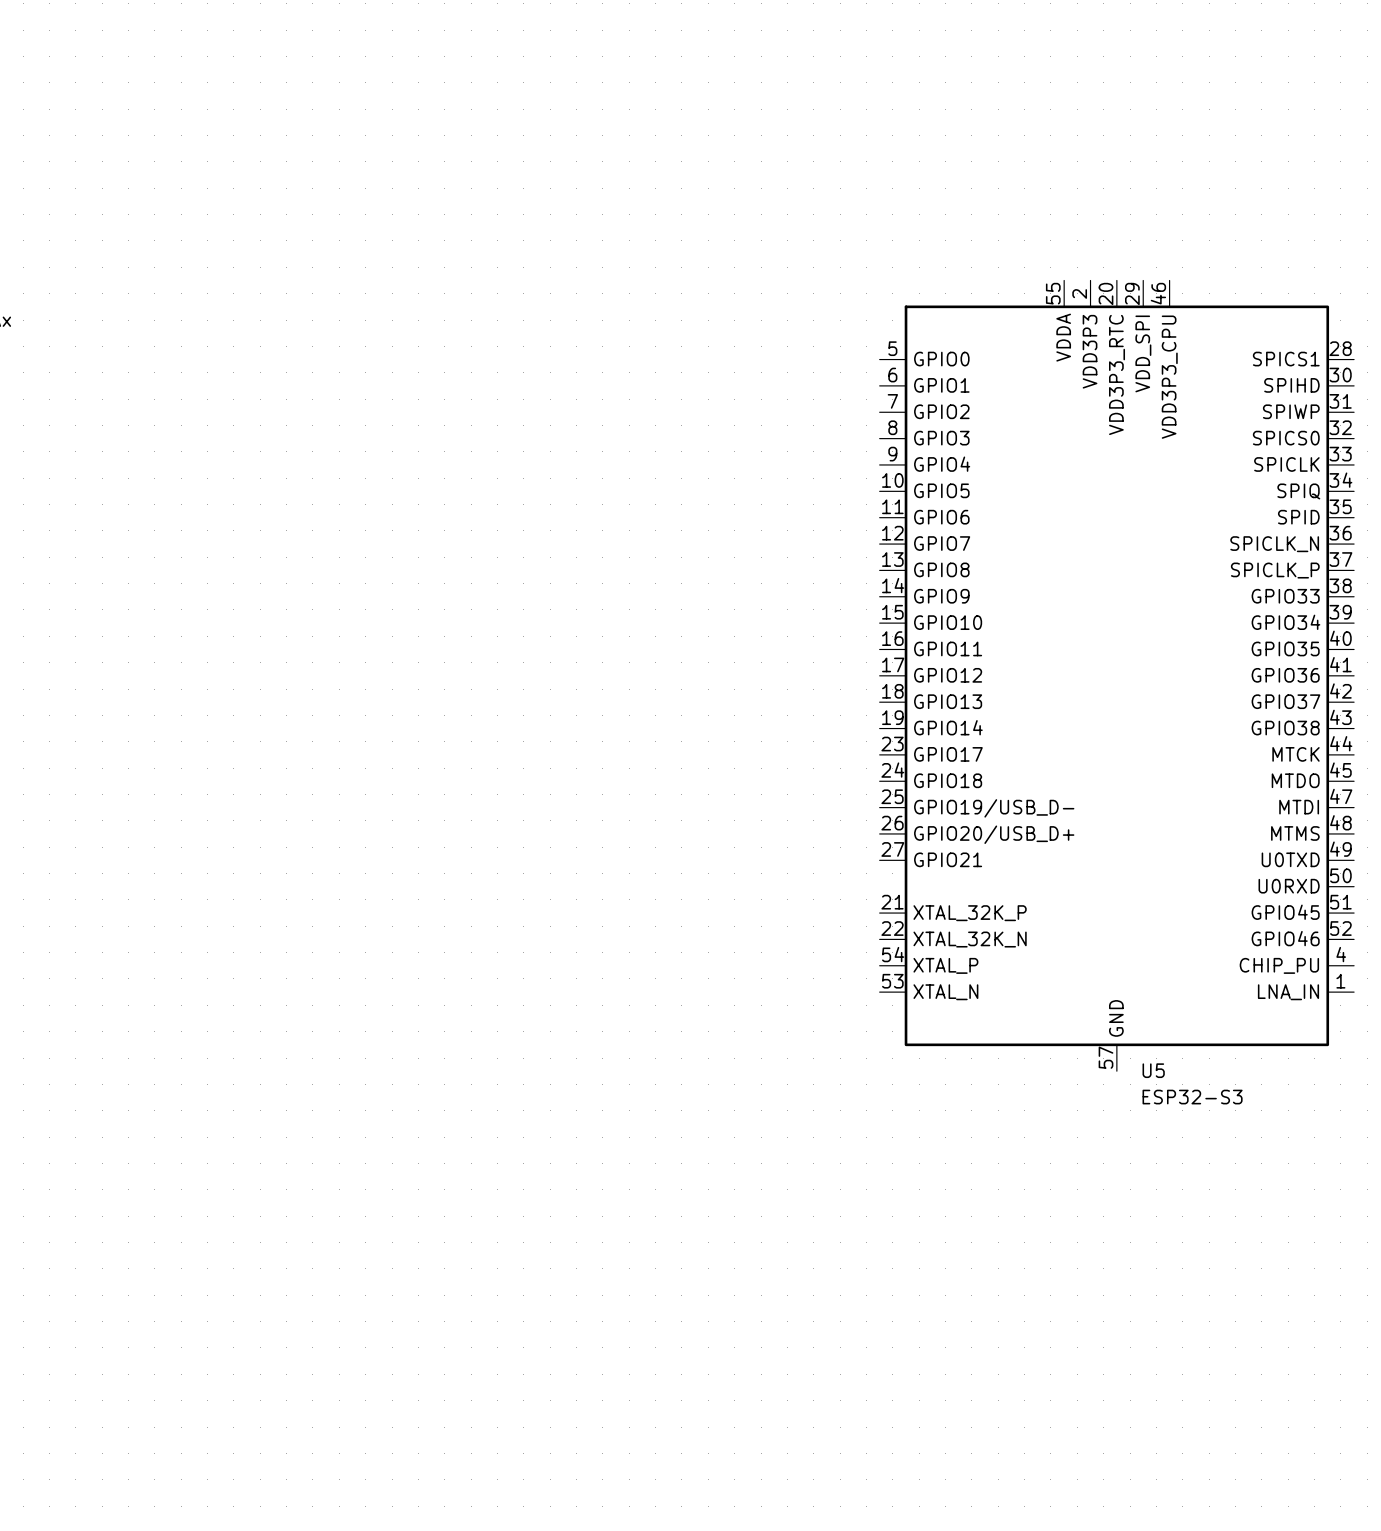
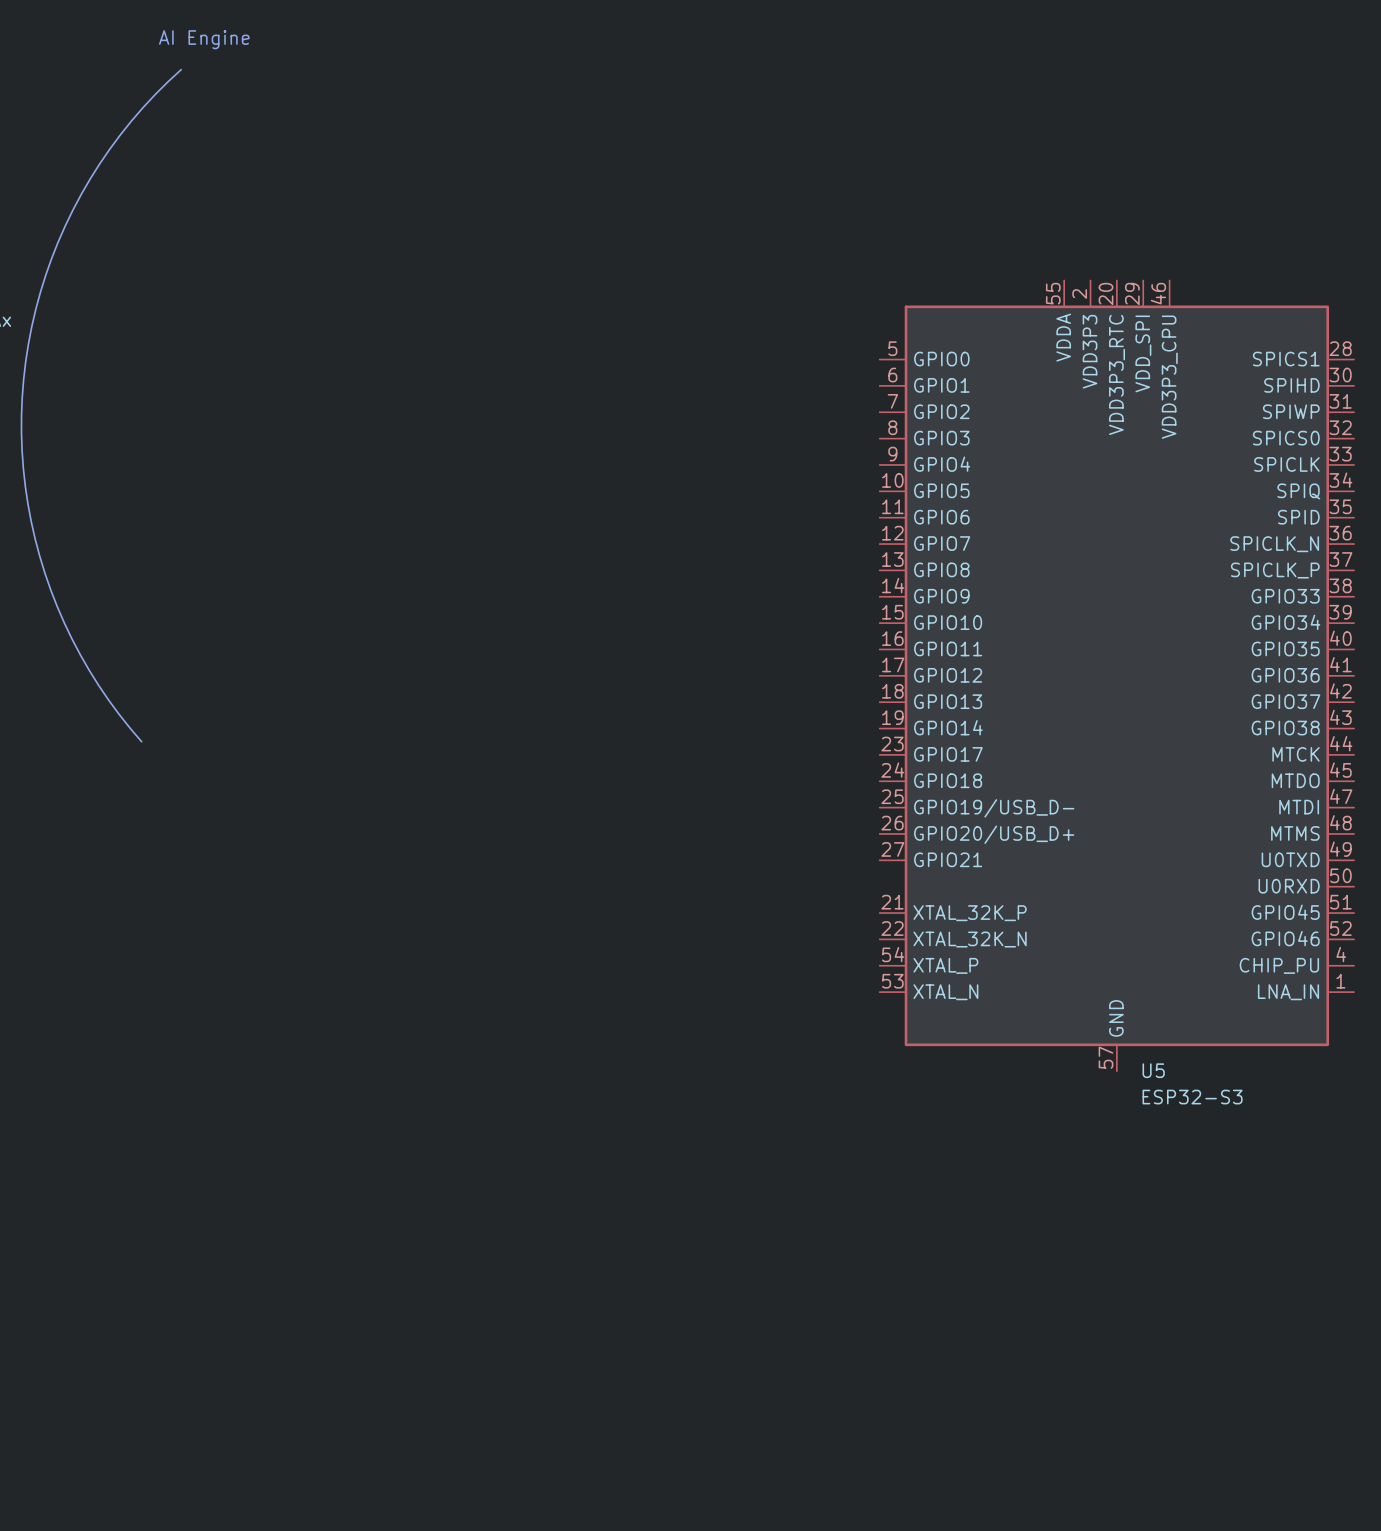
text: none -> AI Engine (204, 39)
line: none -> (181, 69) (143, 107) (120, 134) (99, 163) (73, 209) (58, 242) (40, 292) (28, 344) (22, 397) (21, 433) (25, 486) (35, 538) (50, 589) (64, 622) (89, 670) (119, 714) (141, 741)

